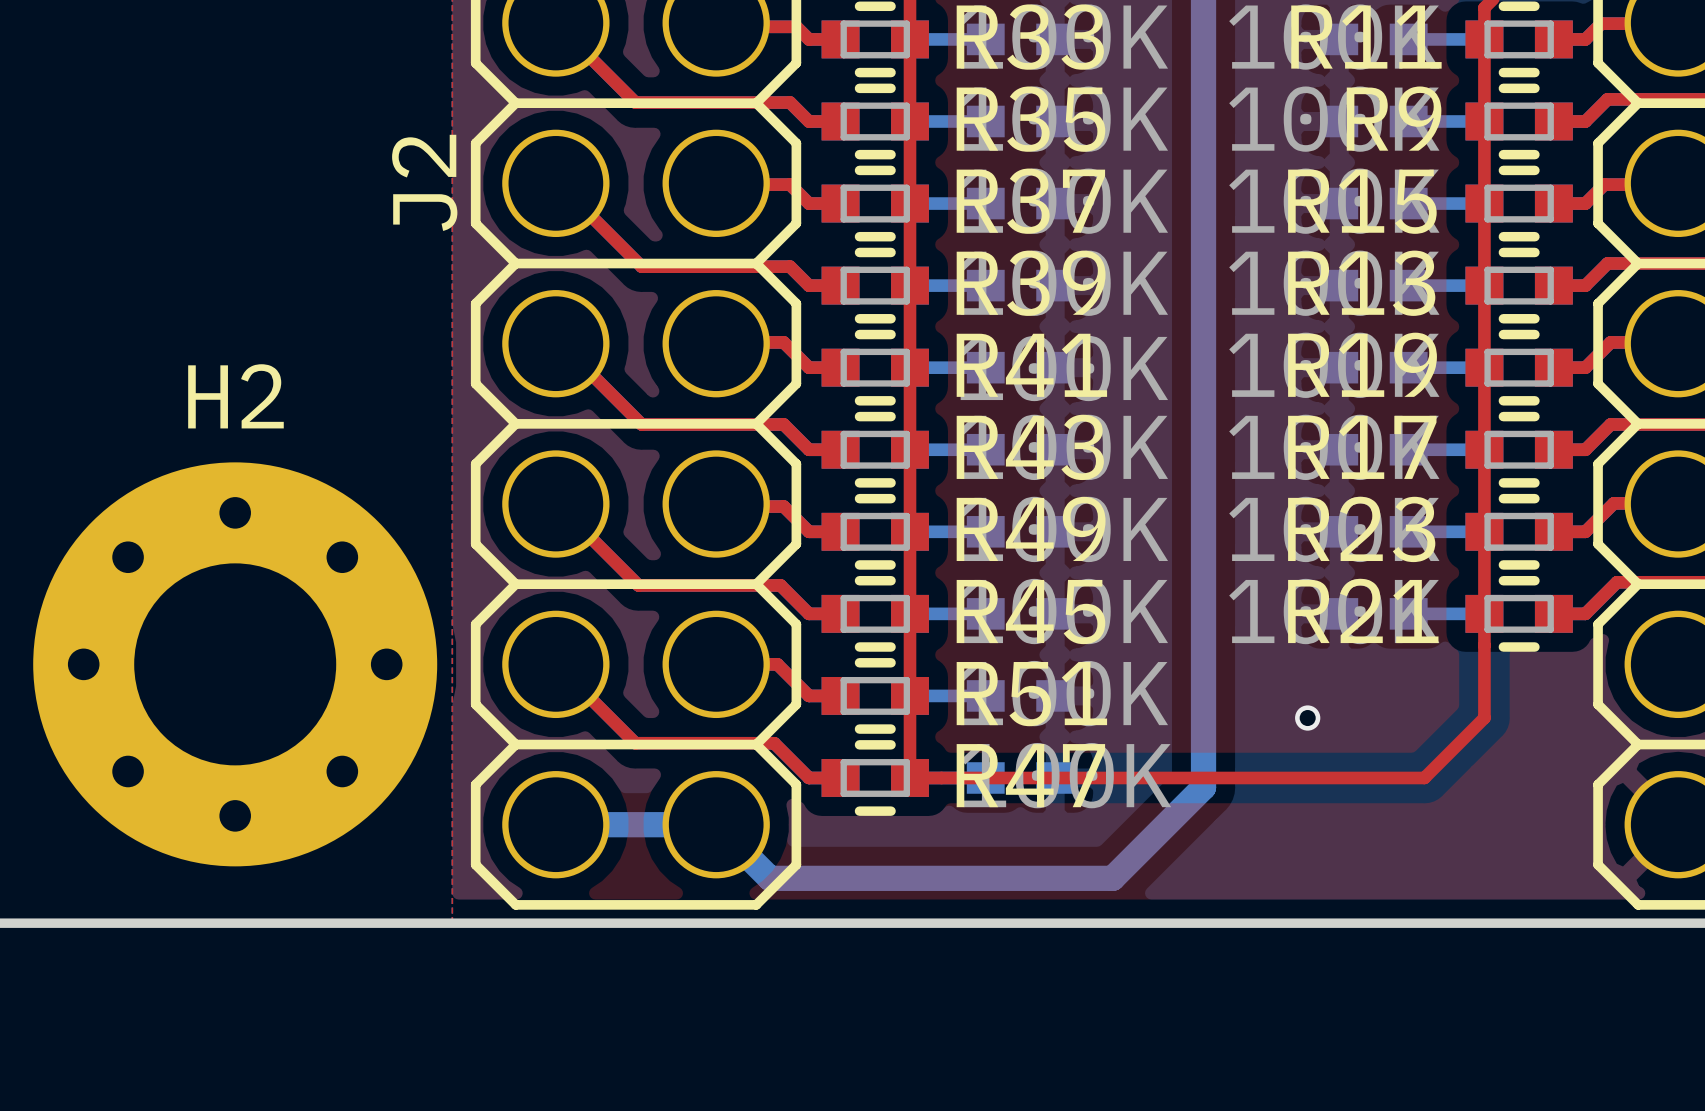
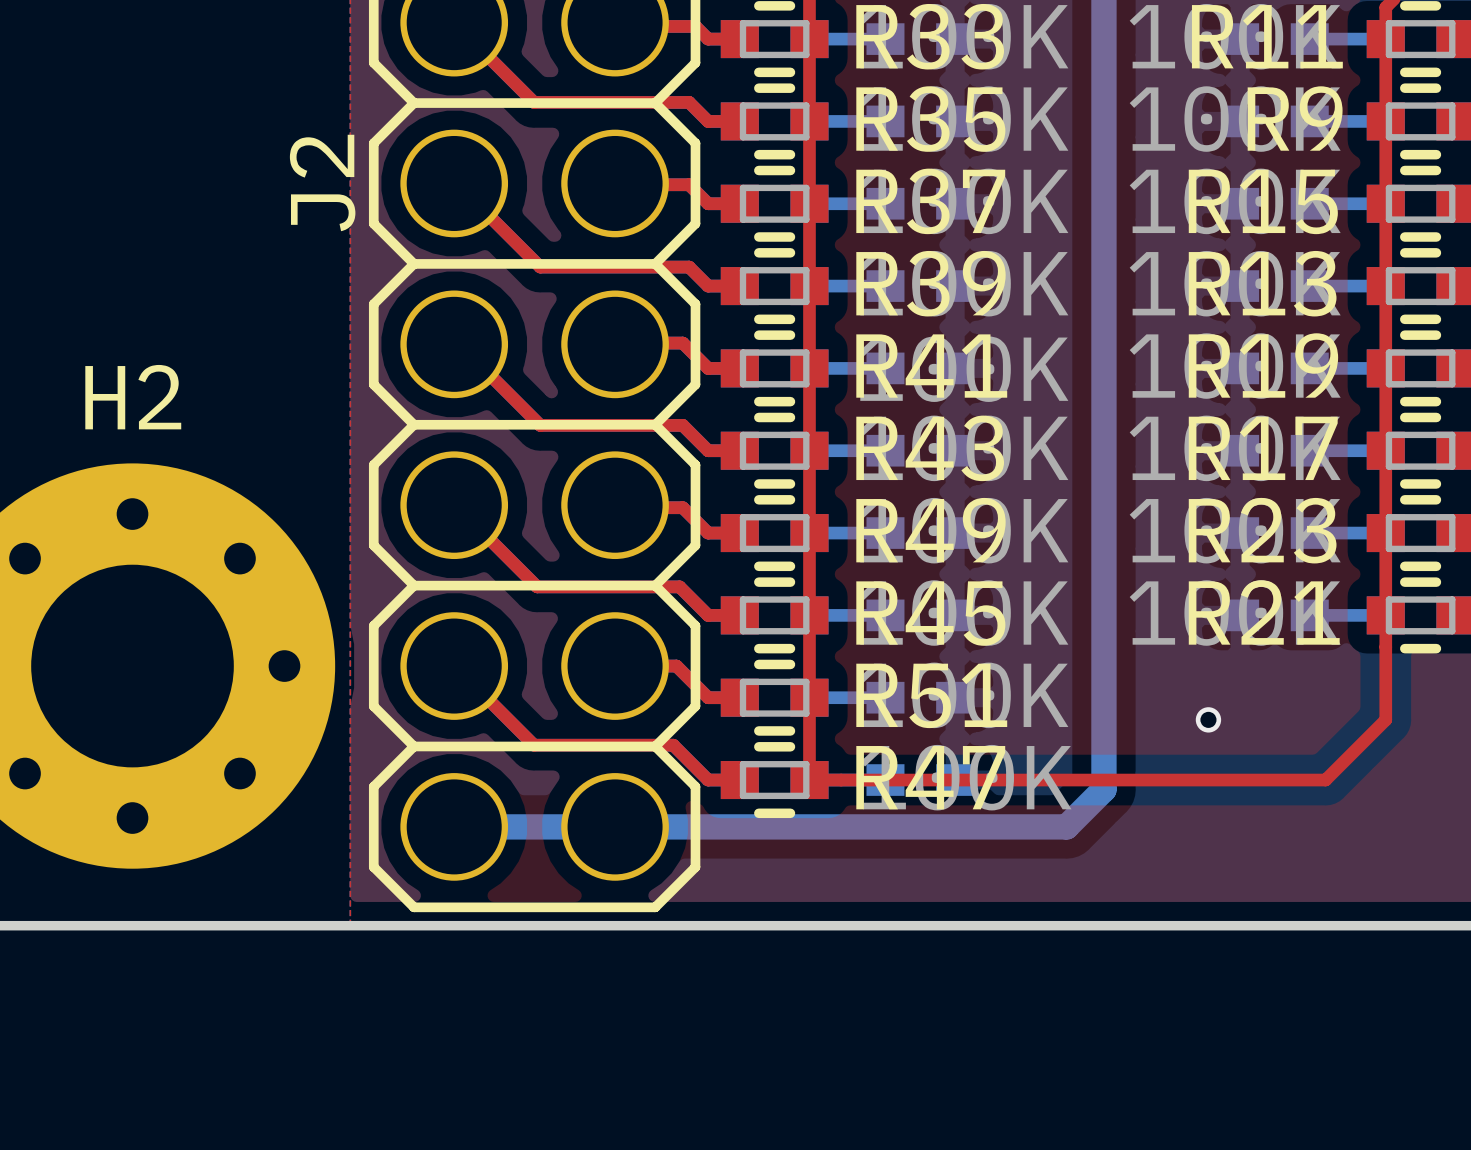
bottom track: (716, 824) (769, 878) (1112, 878) (1166, 824) -> (615, 826) (1066, 826)

